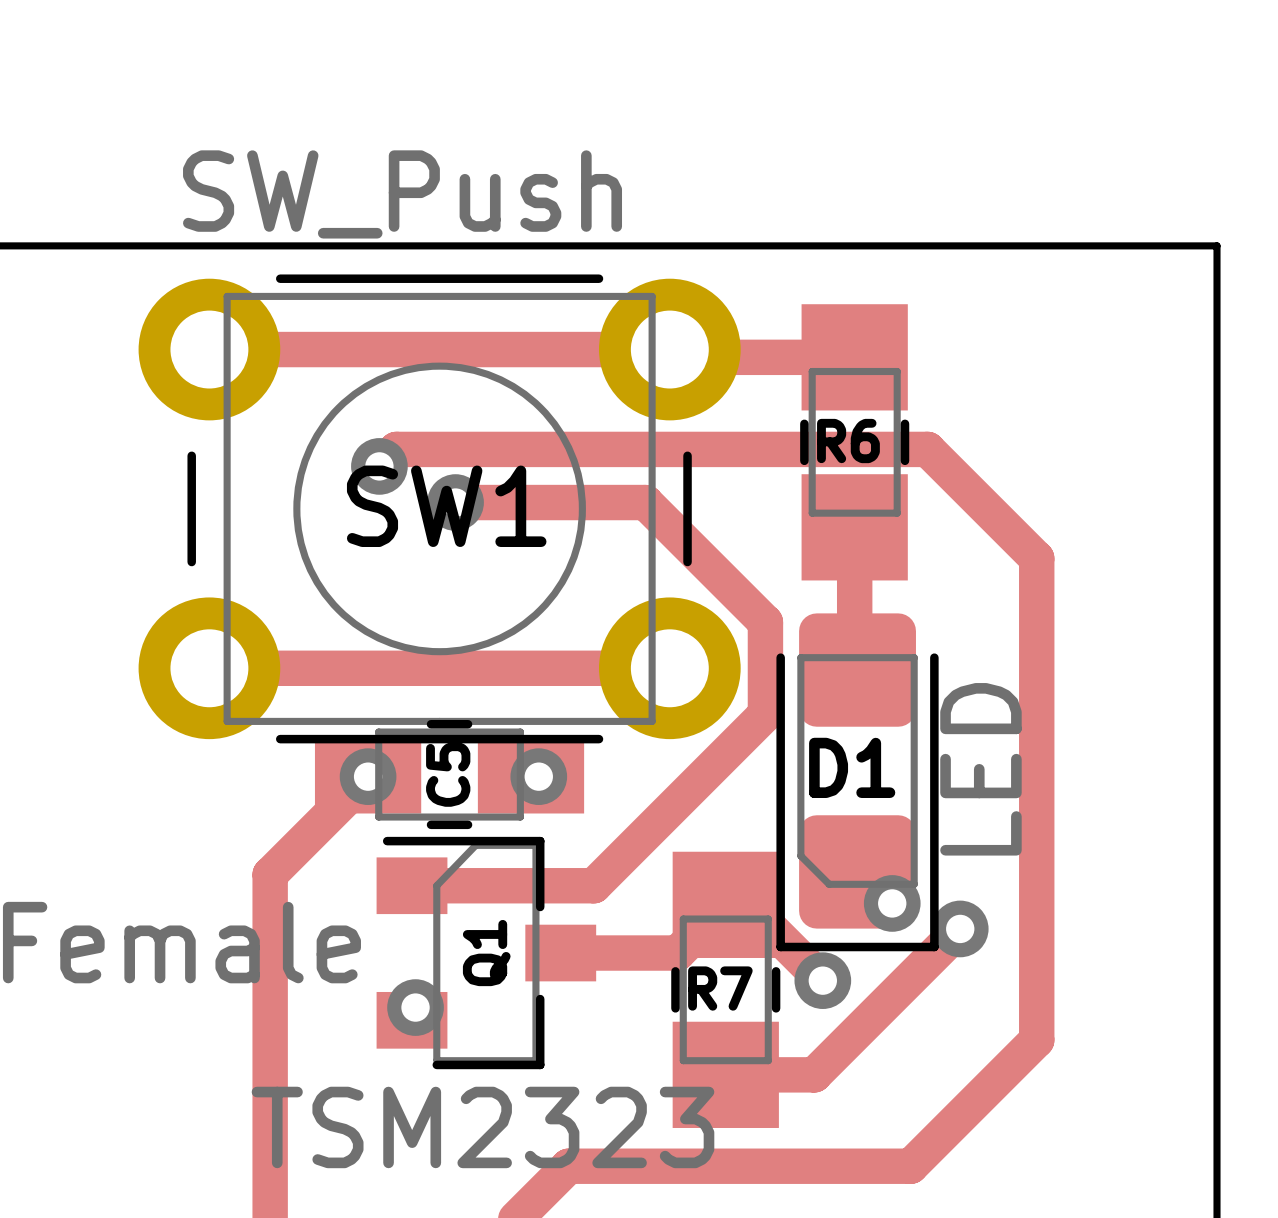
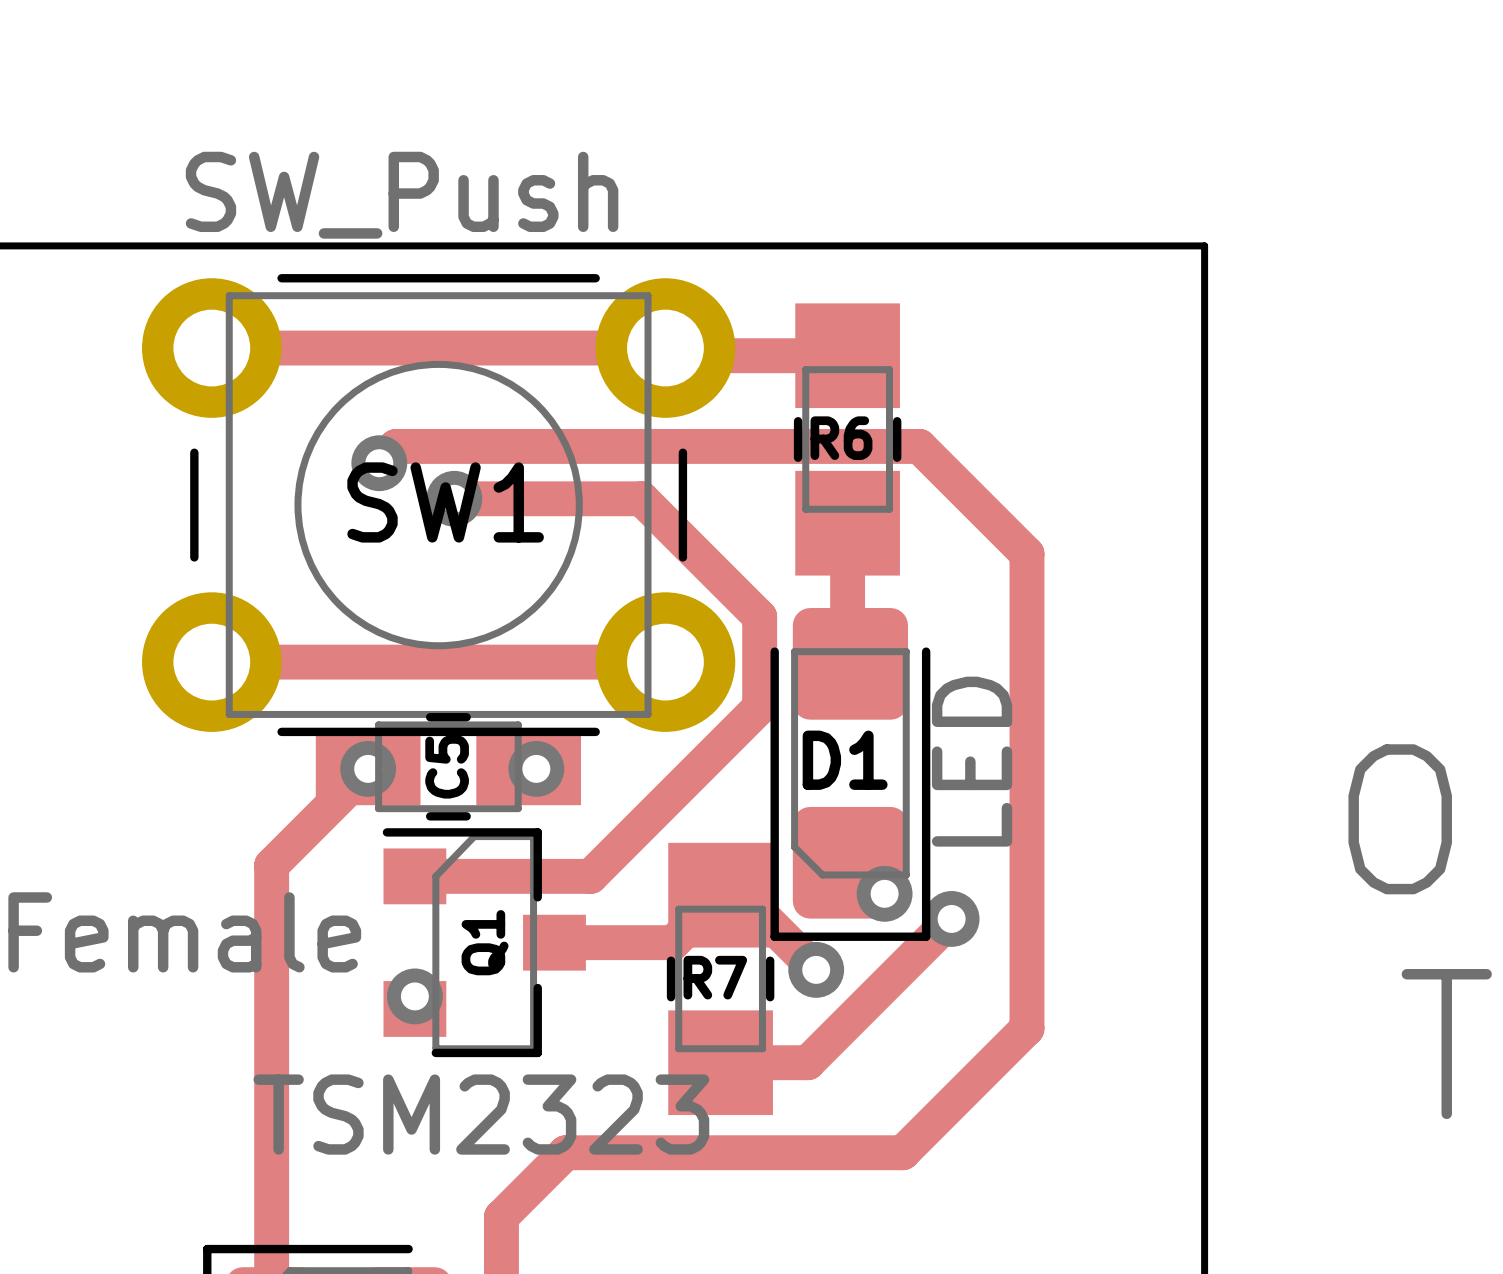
Q1 footprint: [376, 836, 597, 1070] -> [382, 828, 586, 1058]

